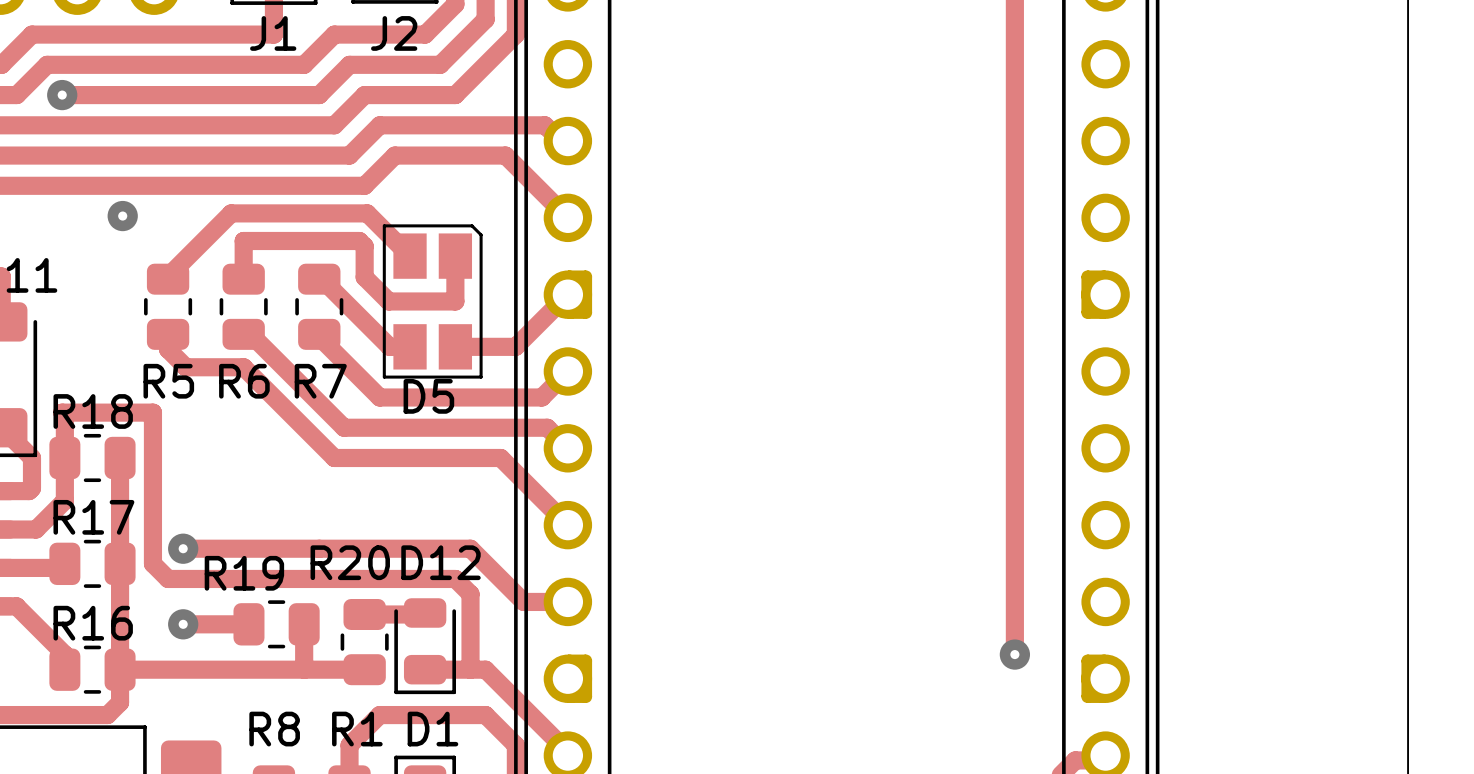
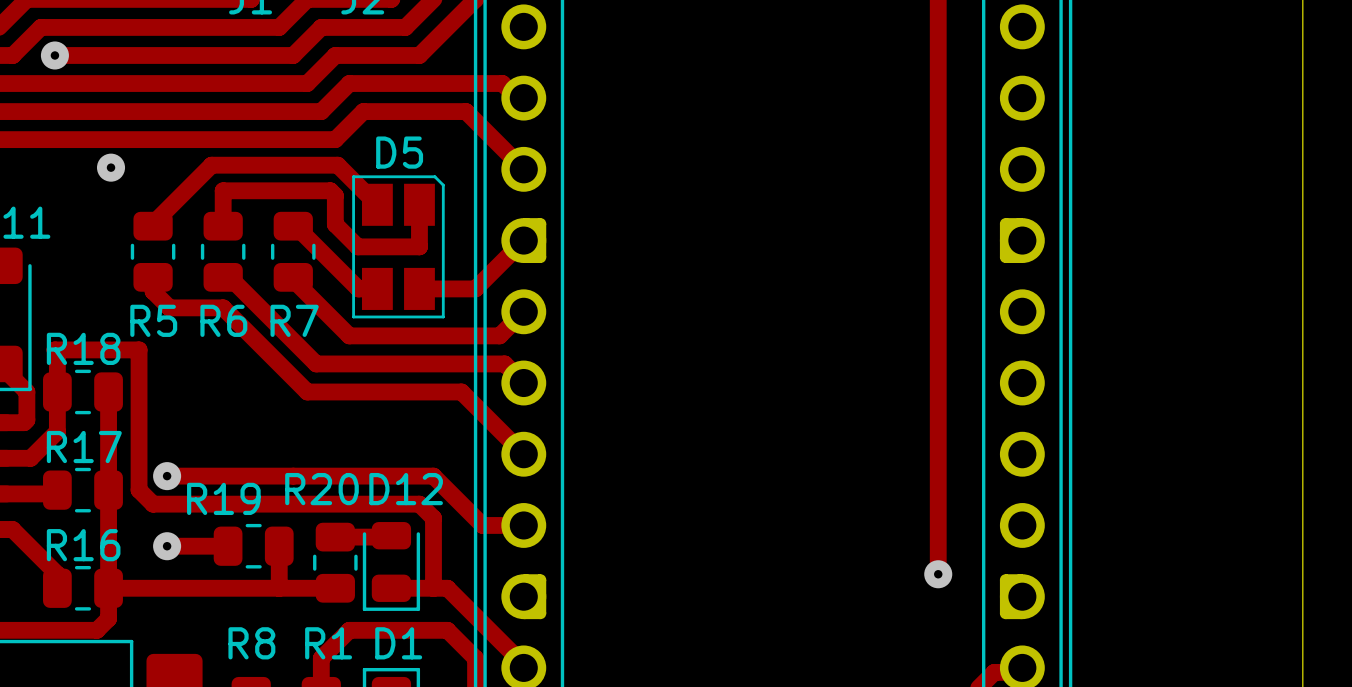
D5 name position: D5 (428, 396) -> D5 (399, 152)

